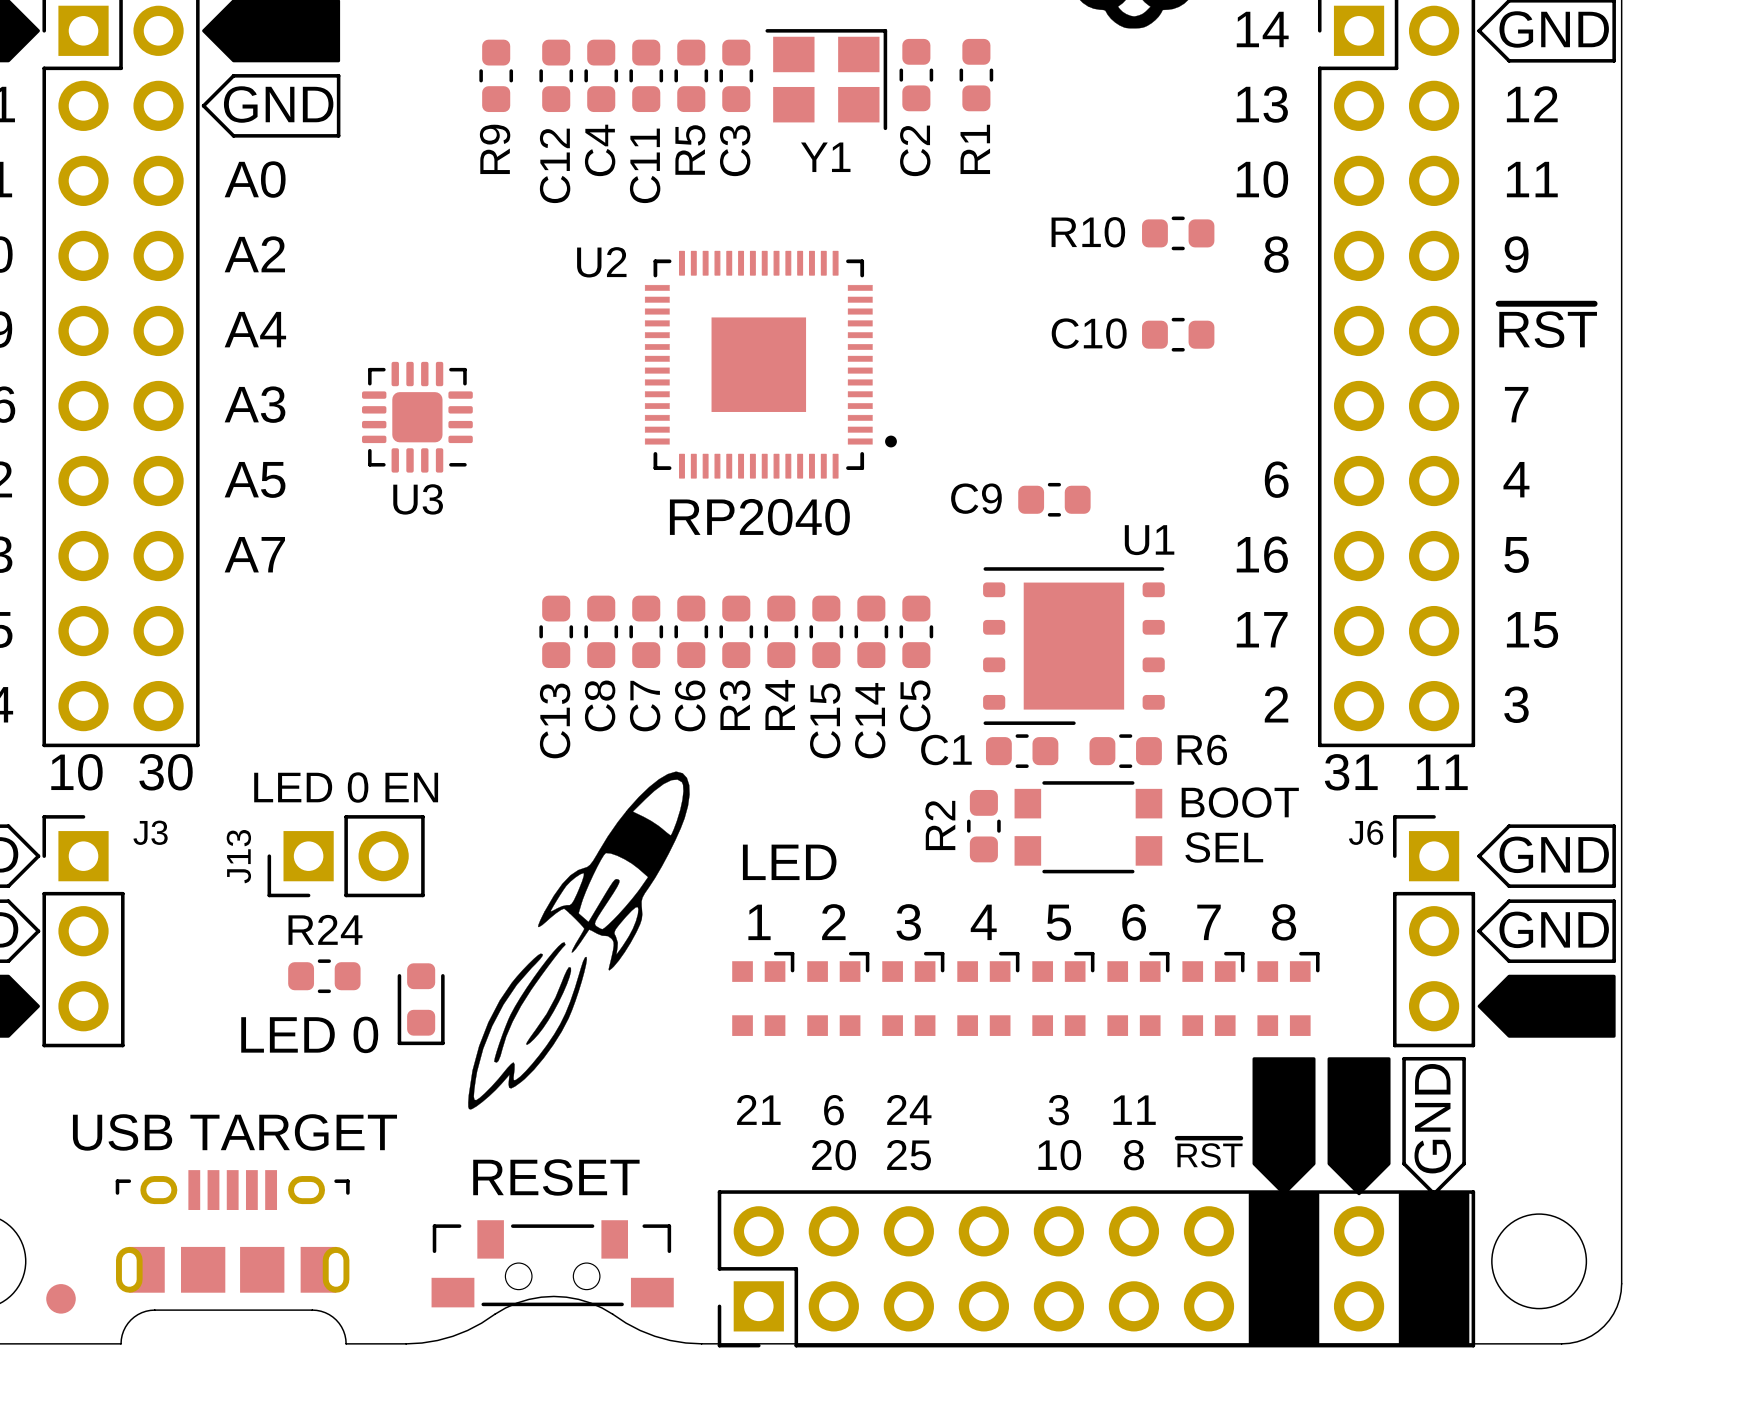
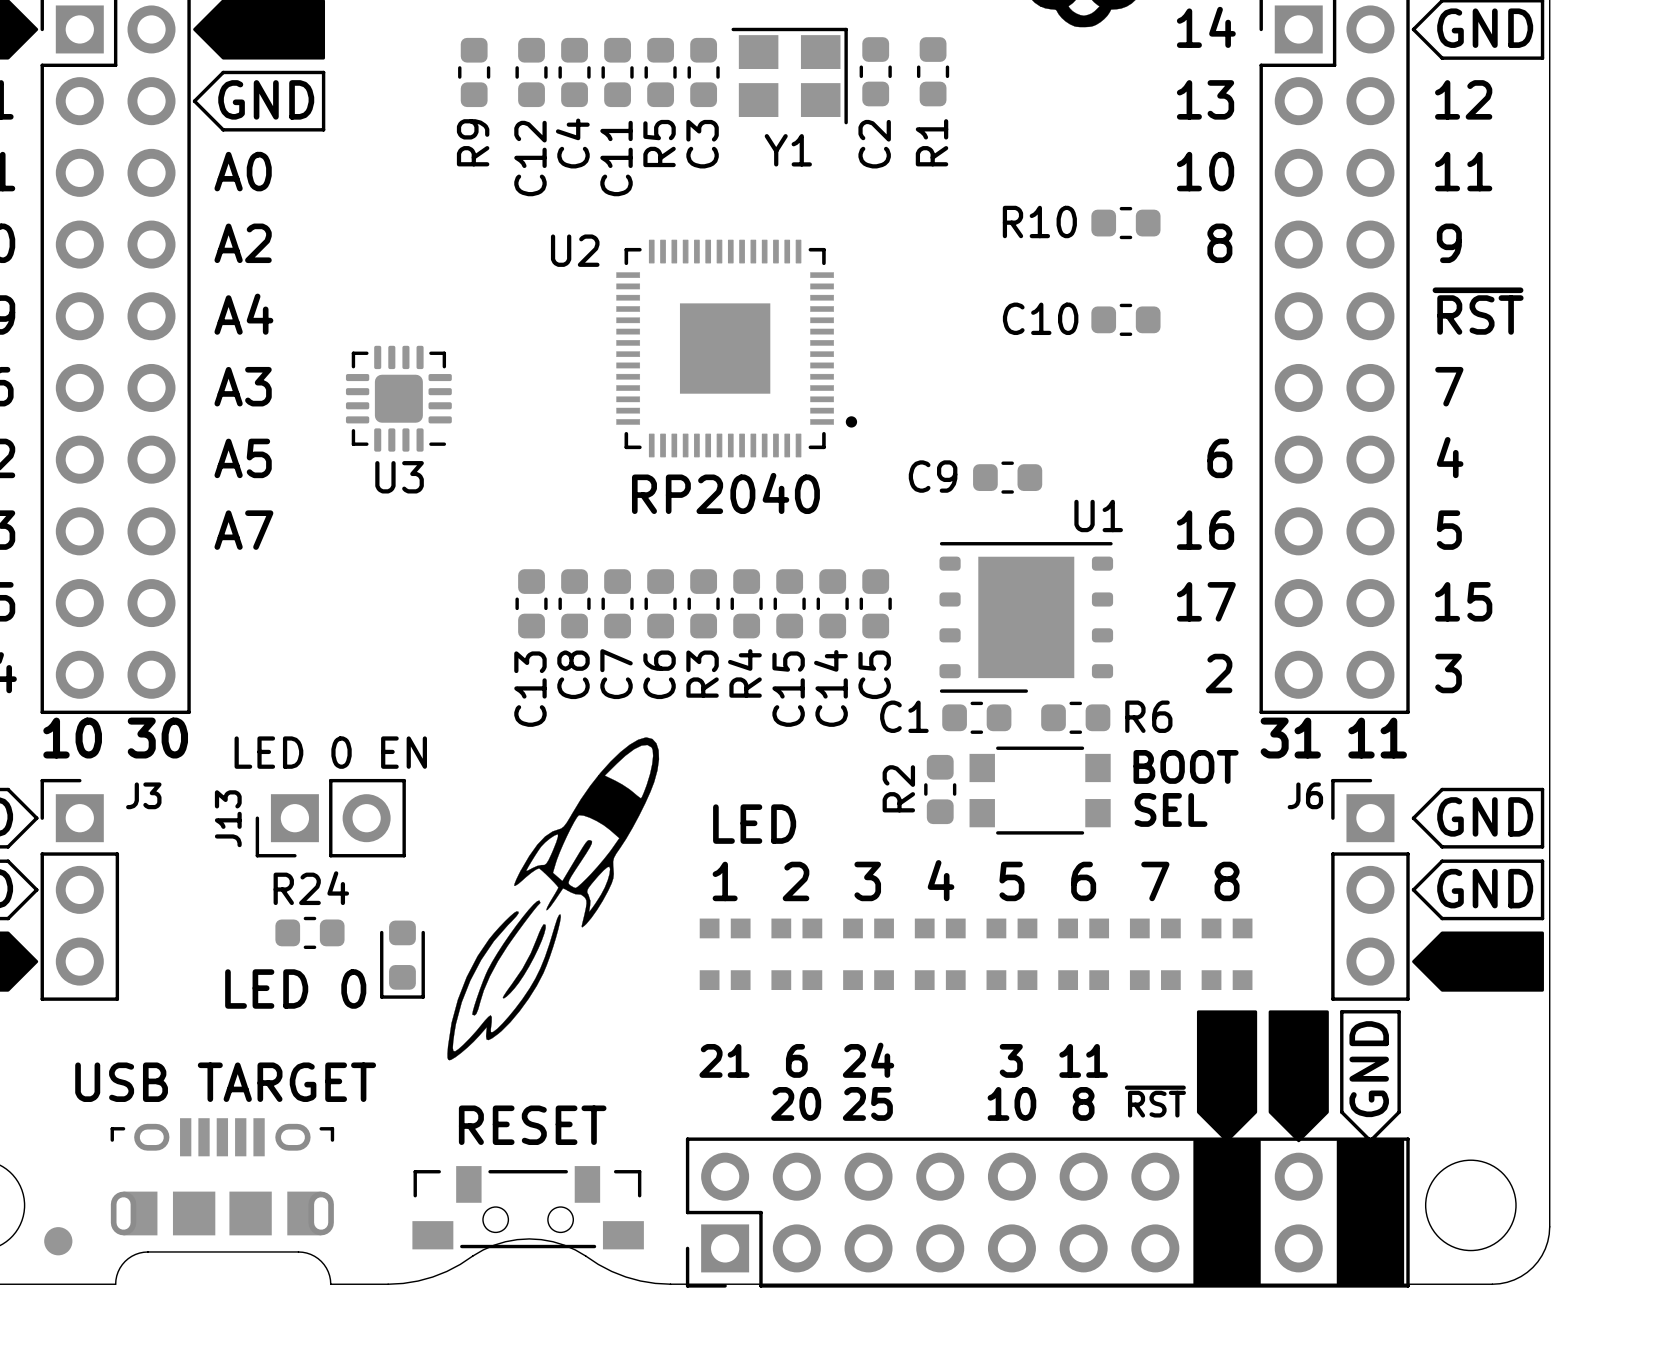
part footprint: [732, 951, 795, 1036] -> [699, 918, 751, 990]
part footprint: [807, 951, 870, 1036] -> [771, 918, 823, 990]
part footprint: [882, 951, 945, 1036] -> [843, 918, 894, 990]
part footprint: [957, 951, 1020, 1036] -> [914, 918, 966, 990]
part footprint: [1032, 951, 1095, 1036] -> [986, 918, 1038, 990]
part footprint: [1107, 951, 1170, 1036] -> [1058, 918, 1110, 990]
part footprint: [1182, 951, 1245, 1036] -> [1129, 918, 1181, 990]
part footprint: [1257, 951, 1320, 1036] -> [1201, 918, 1253, 990]

